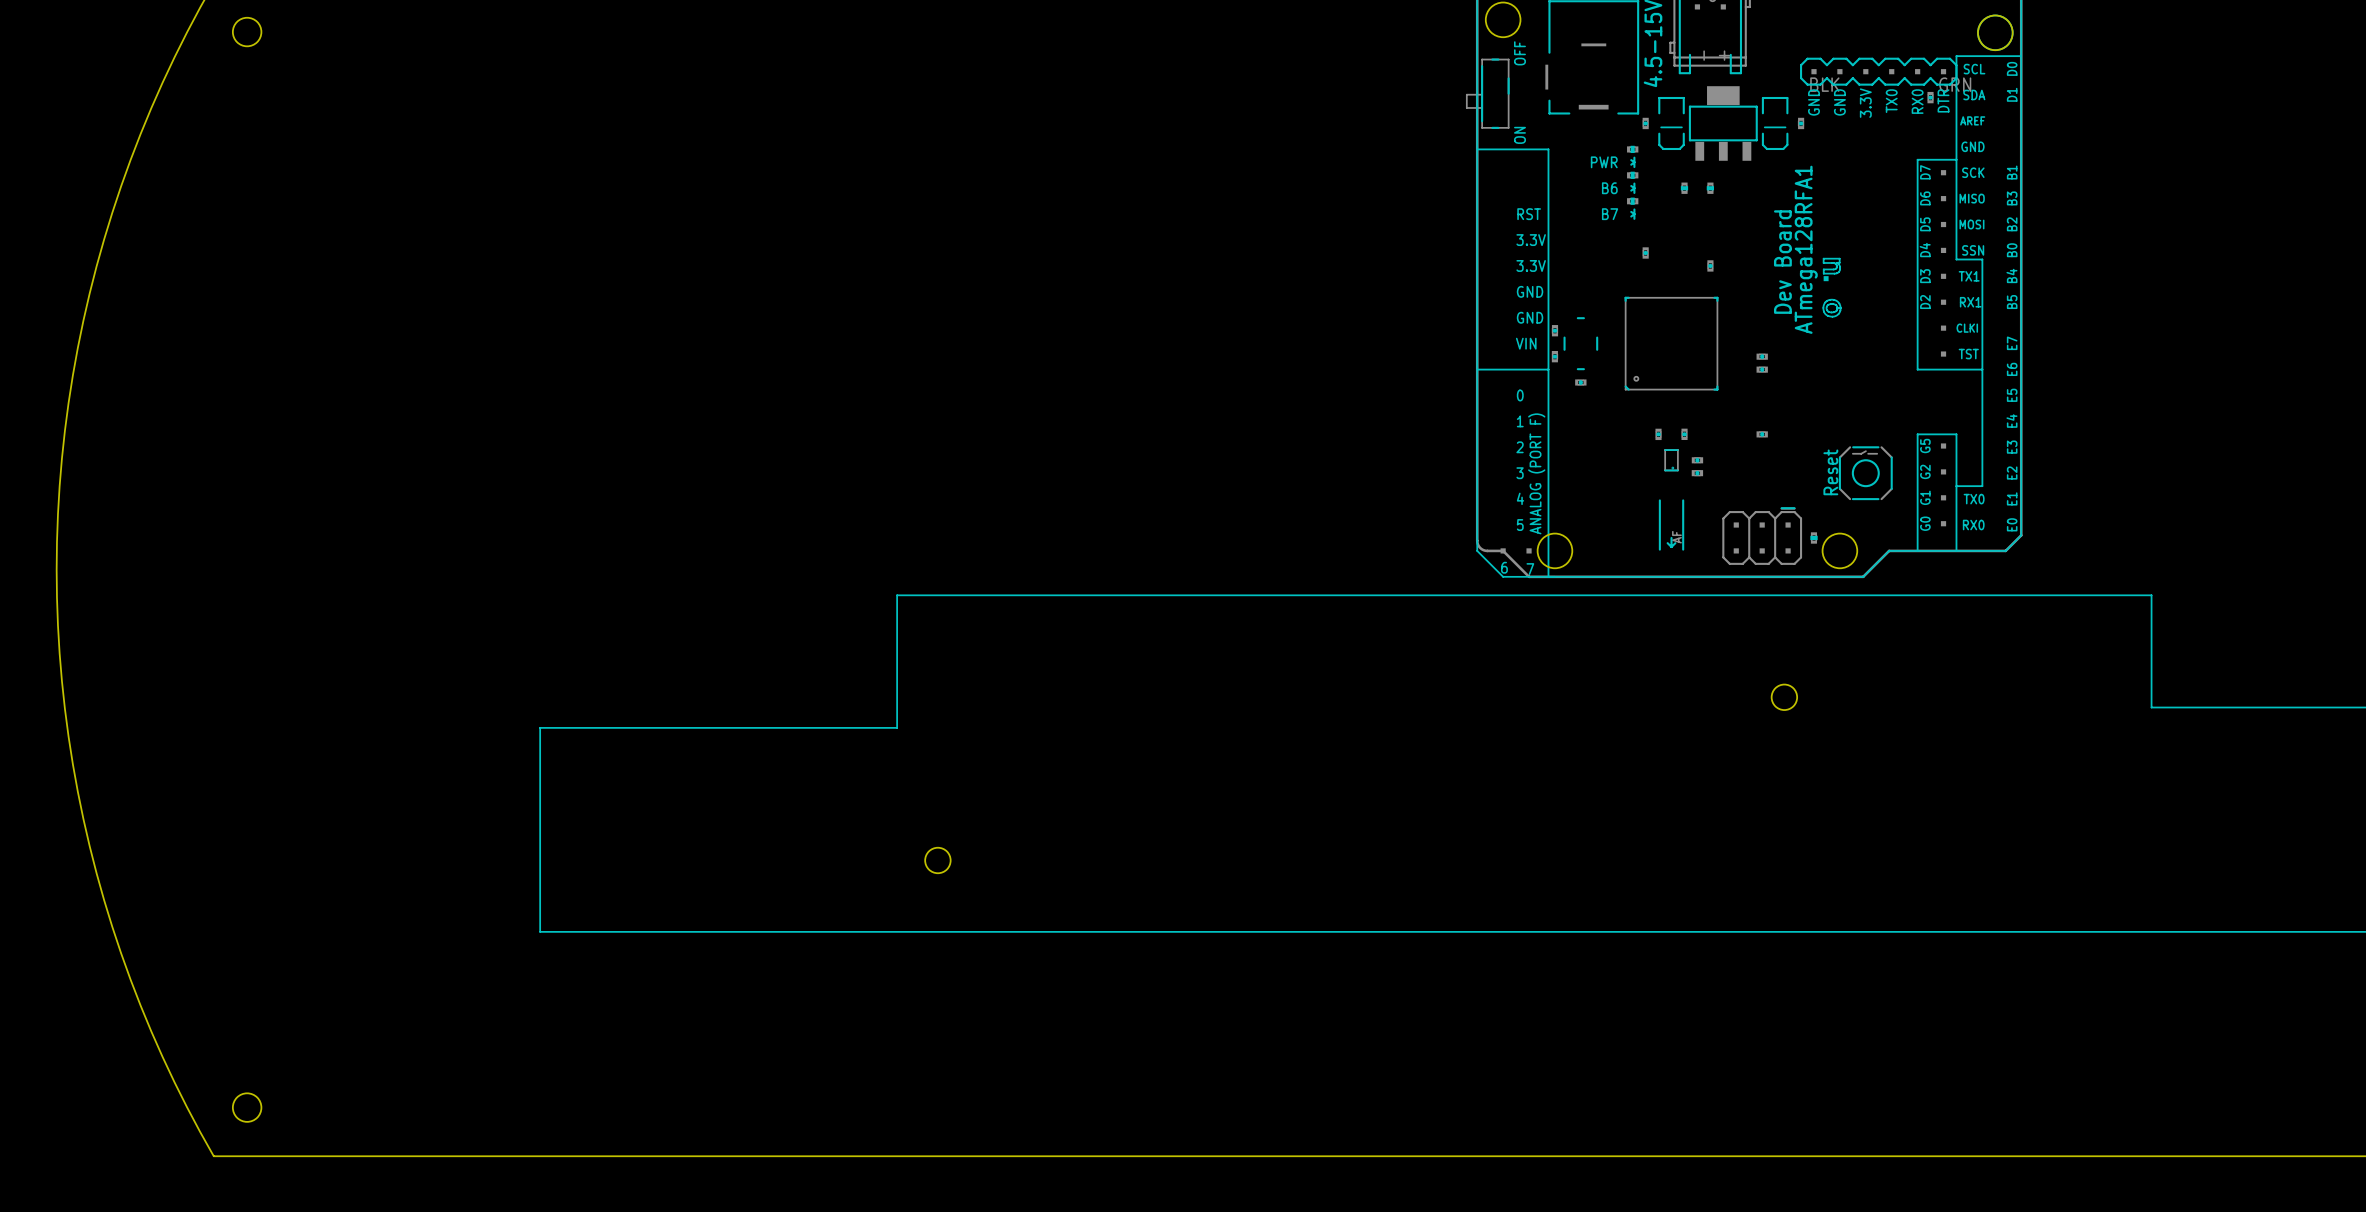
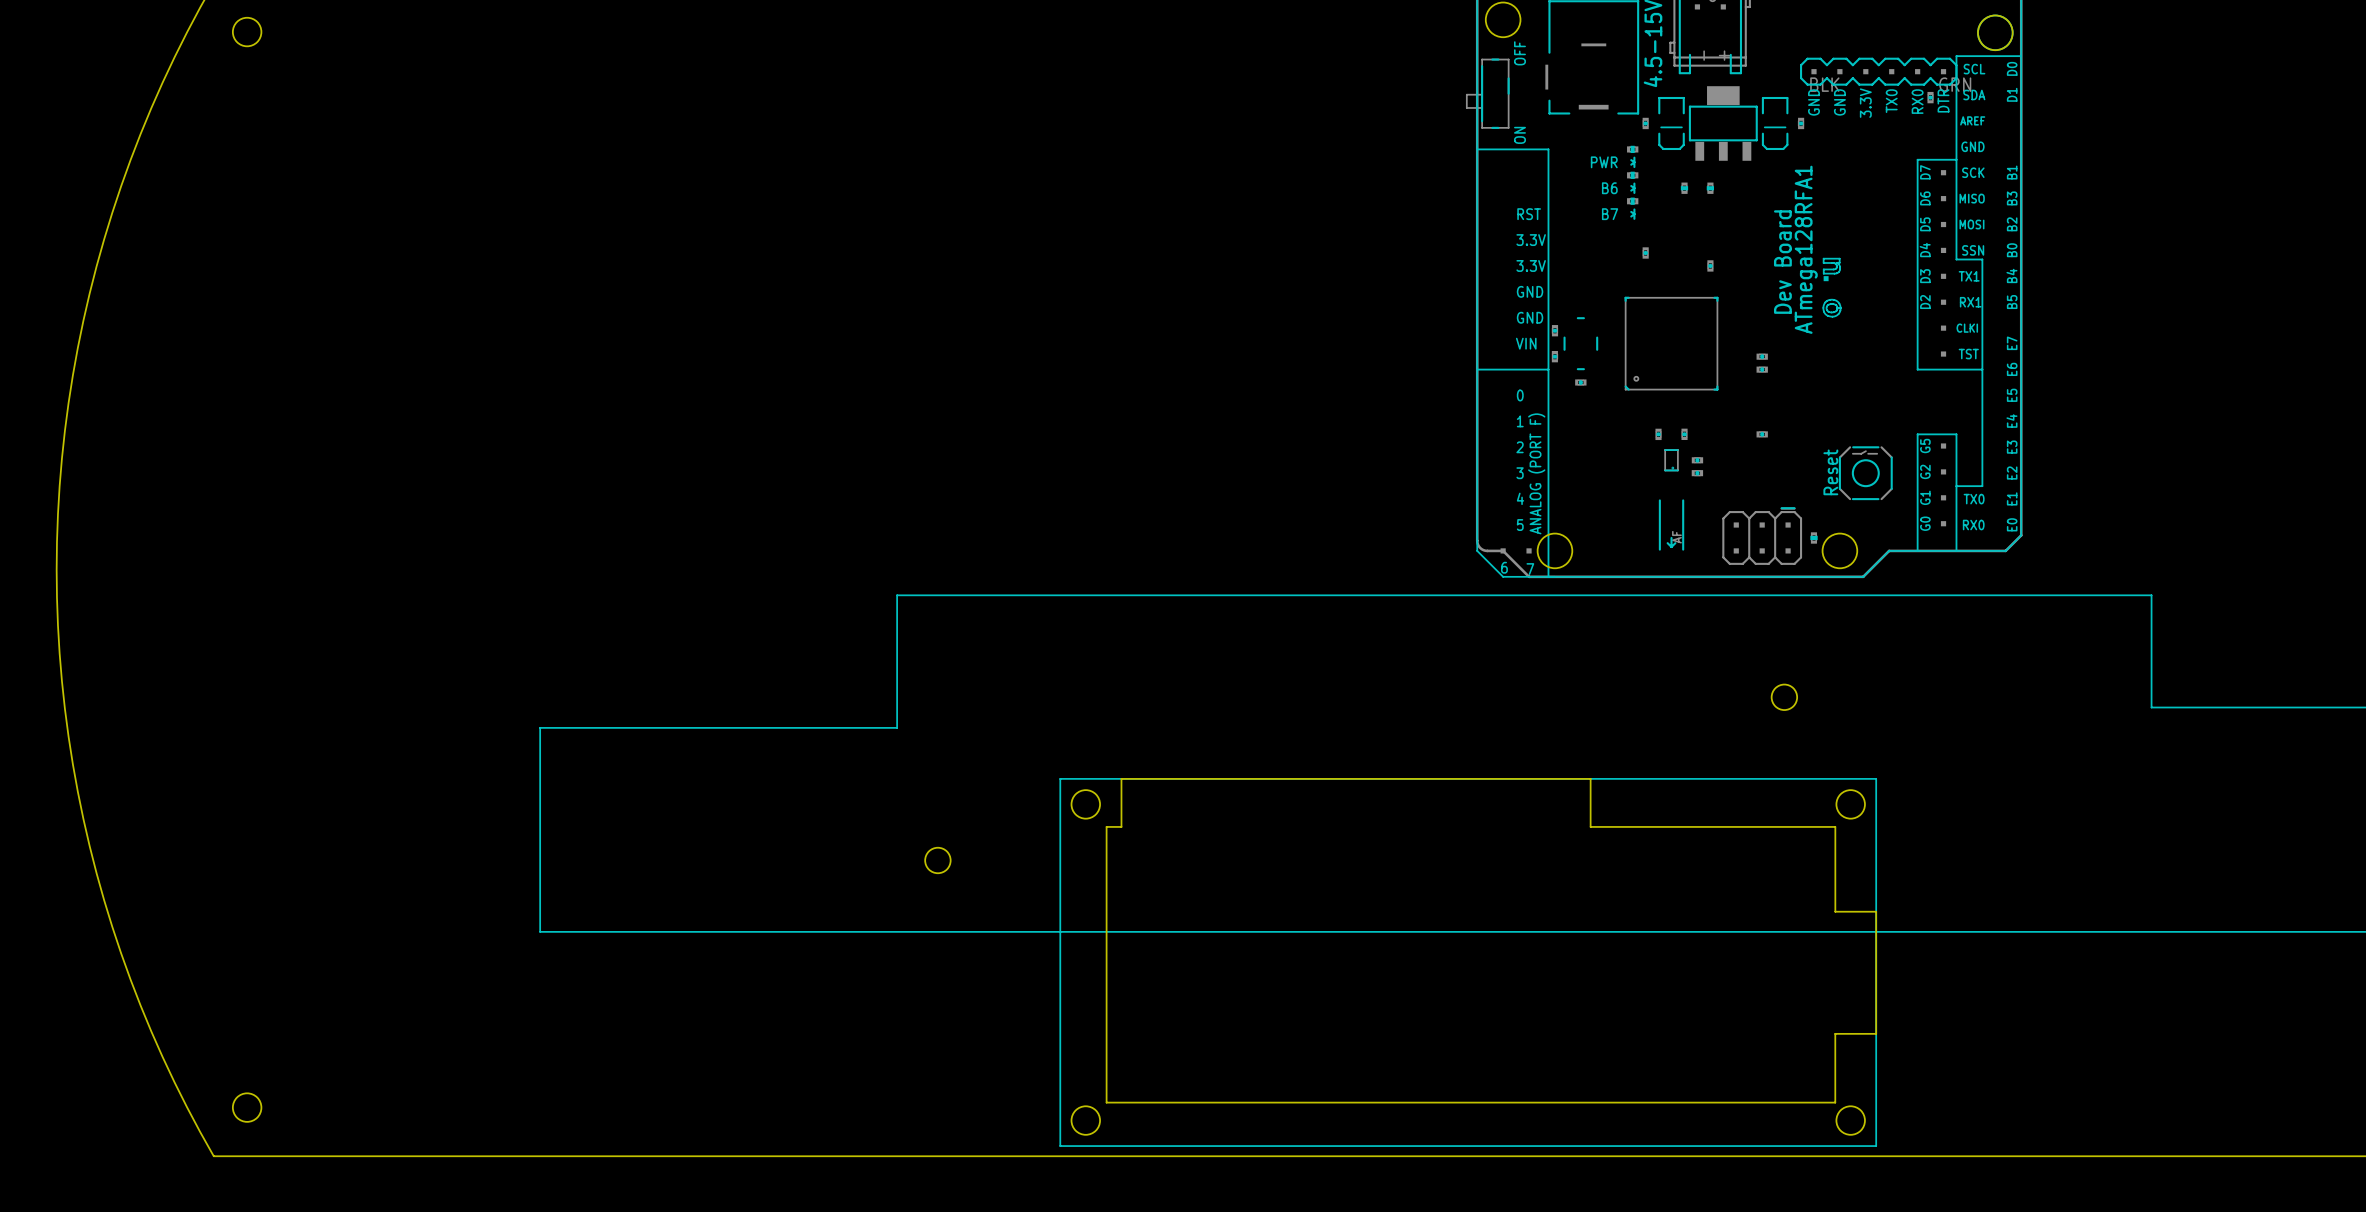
part: none -> (1468, 962)

